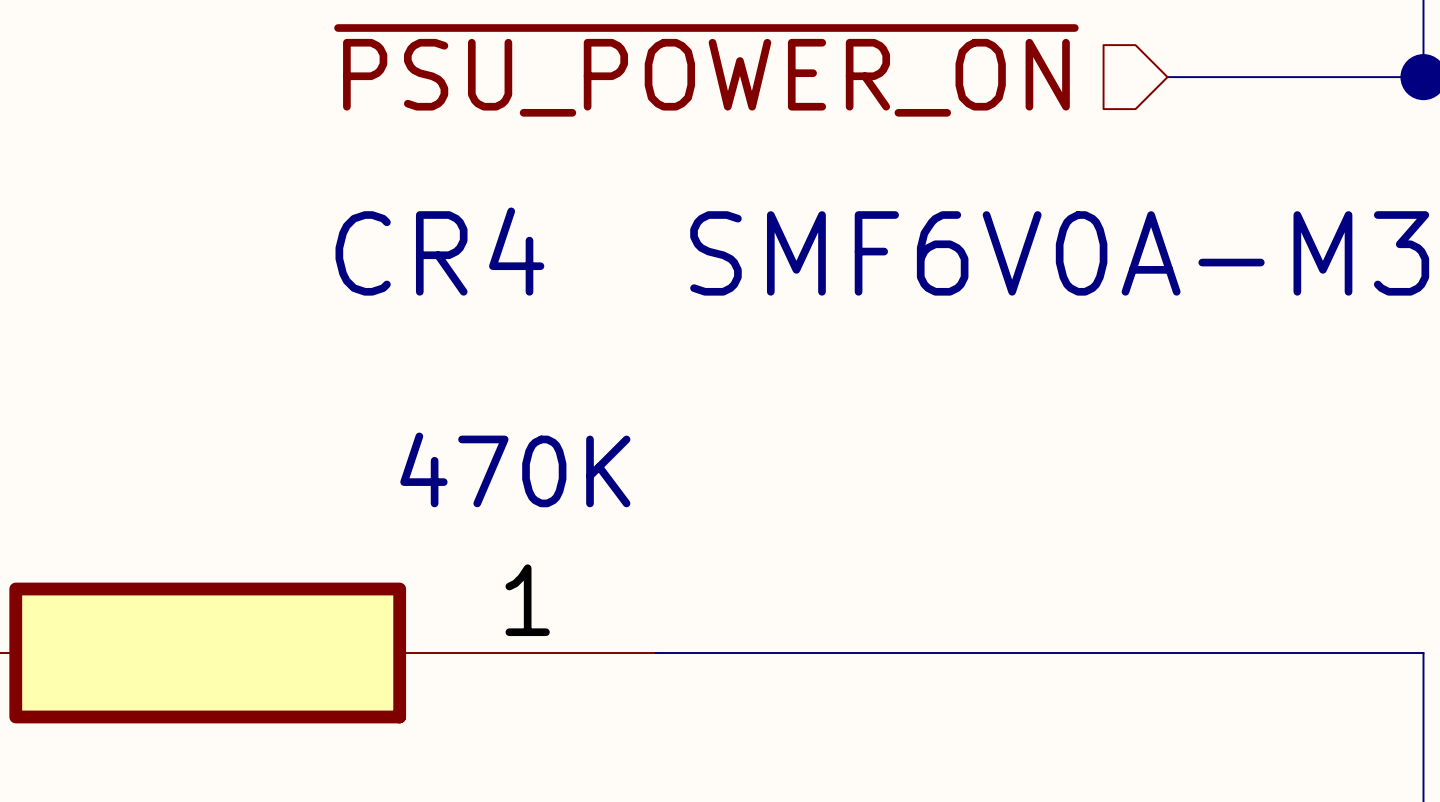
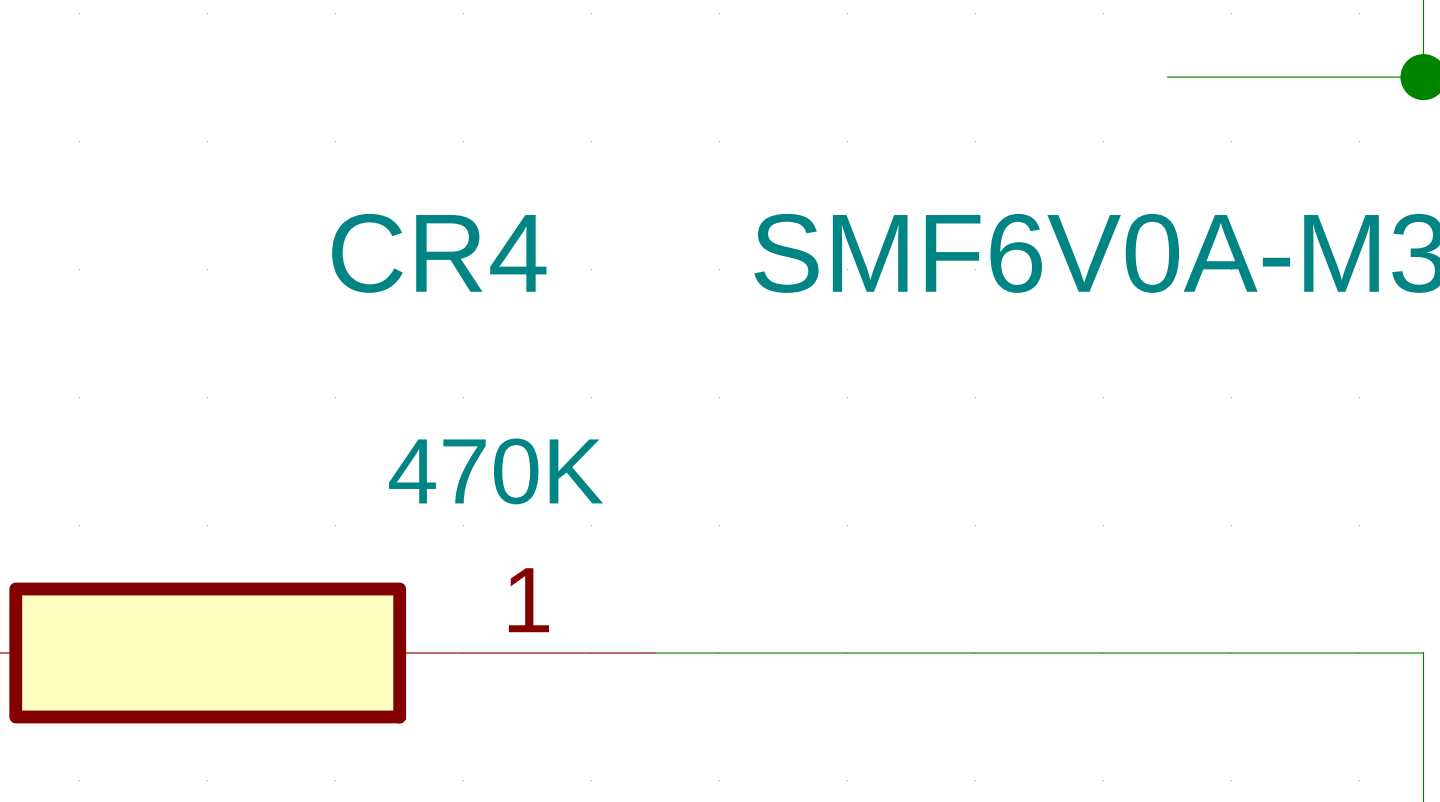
hierarchical label: ~{PSU_POWER_ON} (706, 70) -> none

